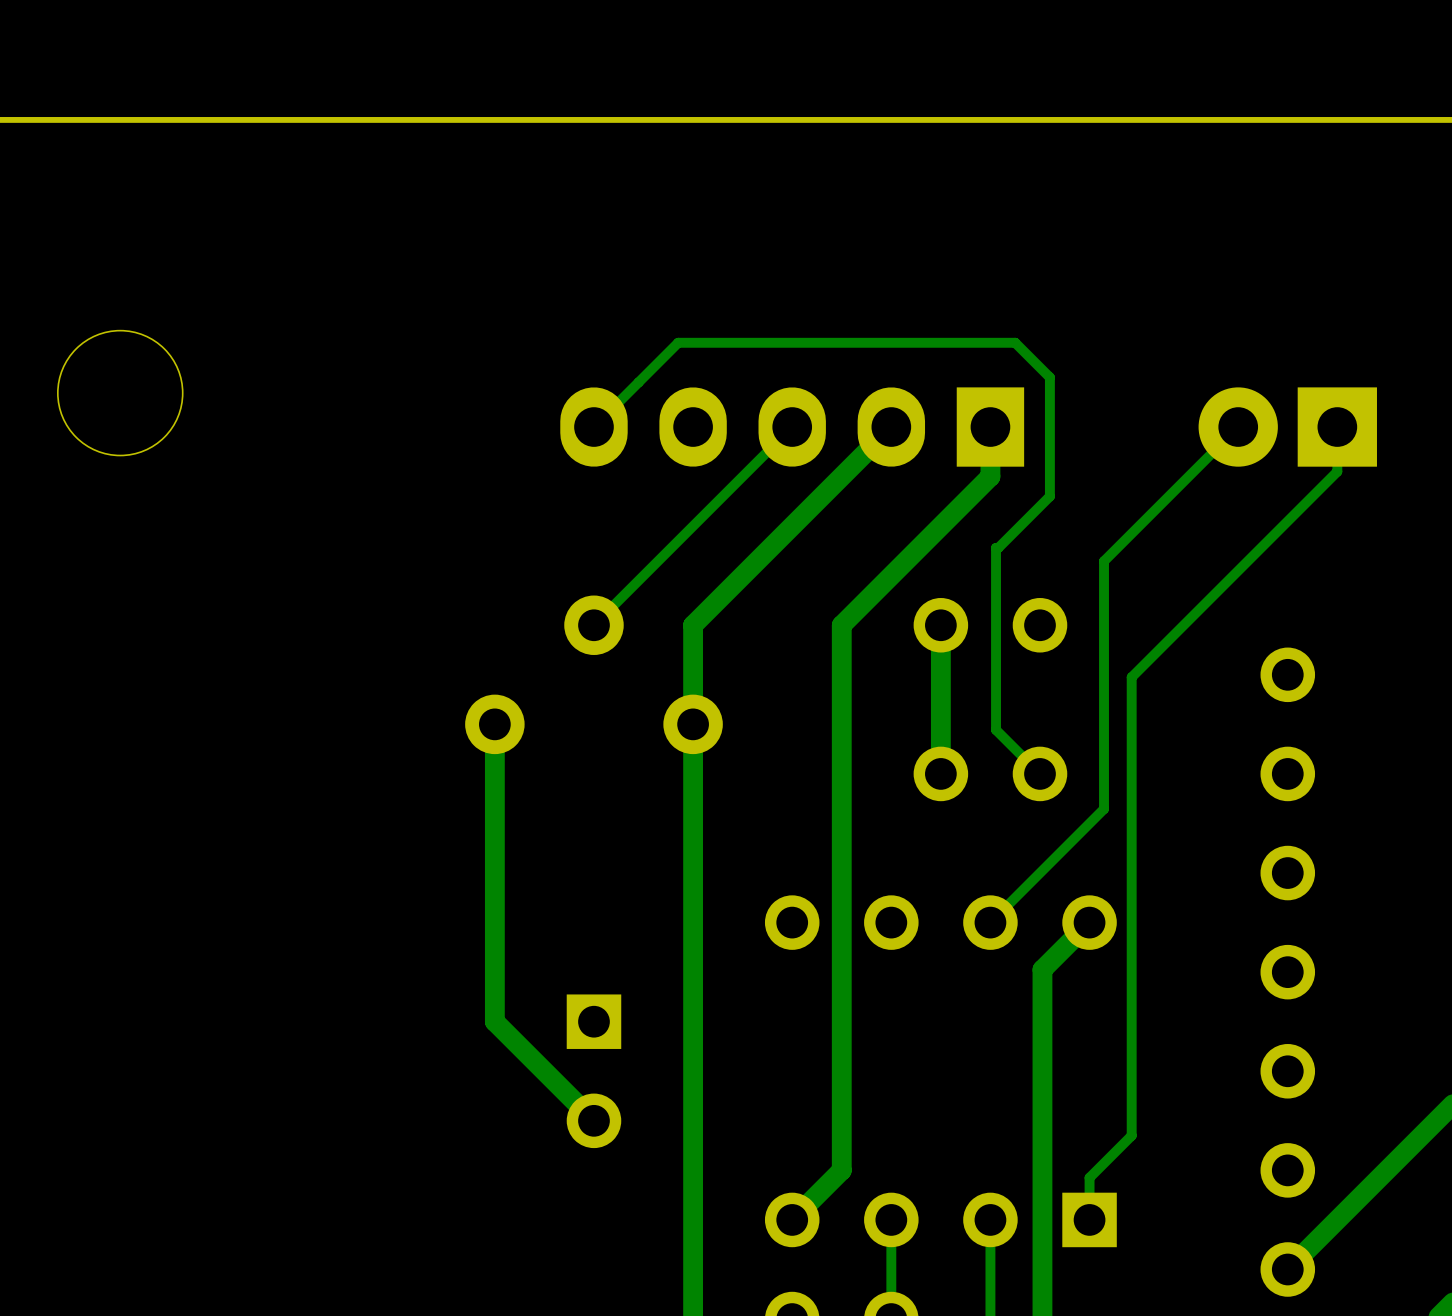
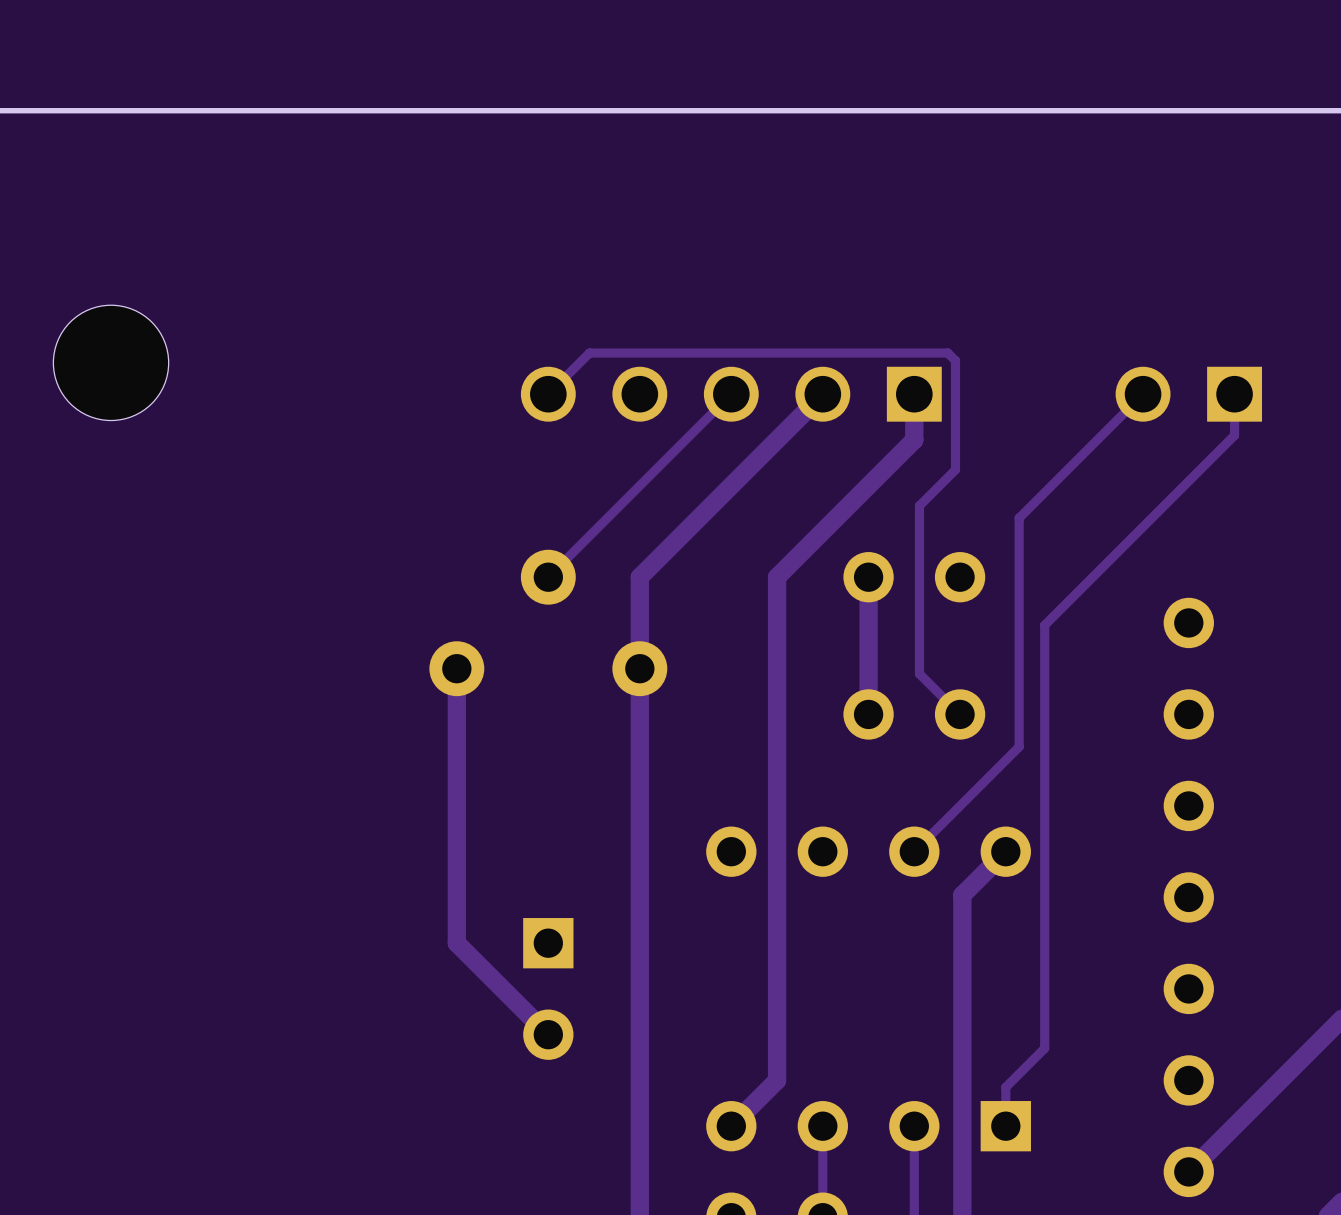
track: (638, 382) (678, 342) (1015, 342) (1049, 377) (1049, 496) (998, 547) (996, 547) -> (589, 353) (947, 353) (955, 360) (955, 469) (919, 505)
part footprint: [560, 387, 1025, 467] -> [520, 366, 942, 422]
part footprint: [1198, 387, 1377, 467] -> [1115, 366, 1263, 422]

